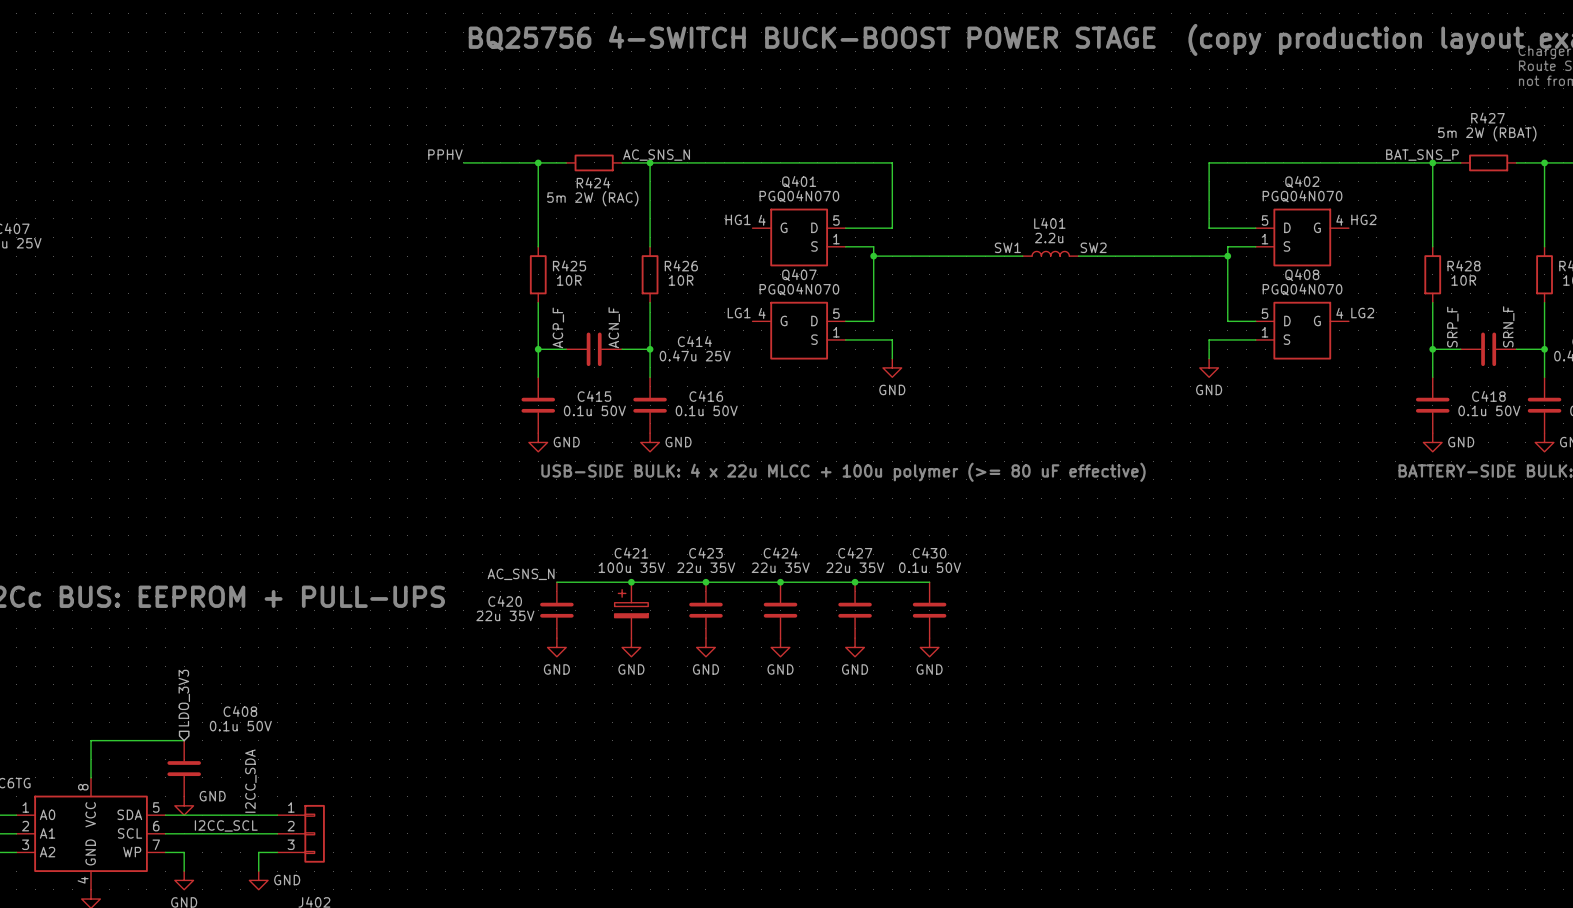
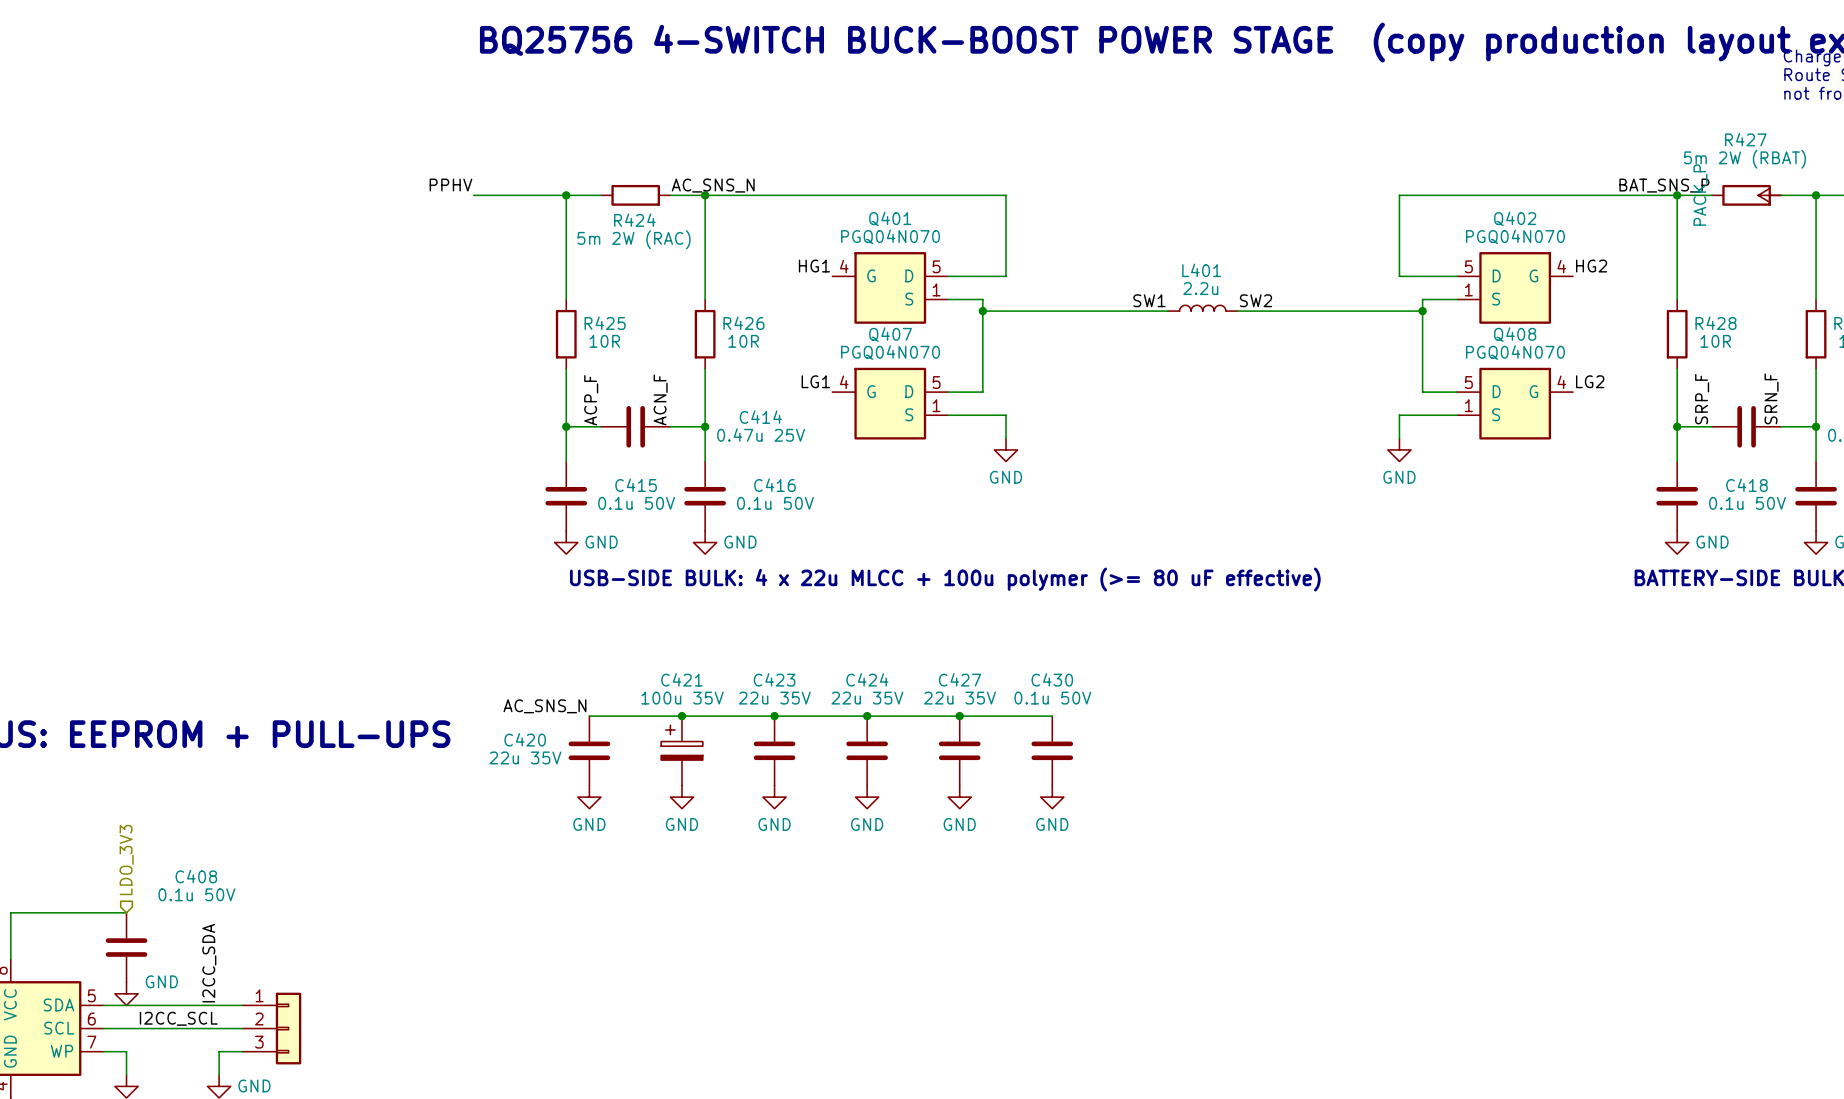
power symbol: none -> PACK_P (1769, 195)

